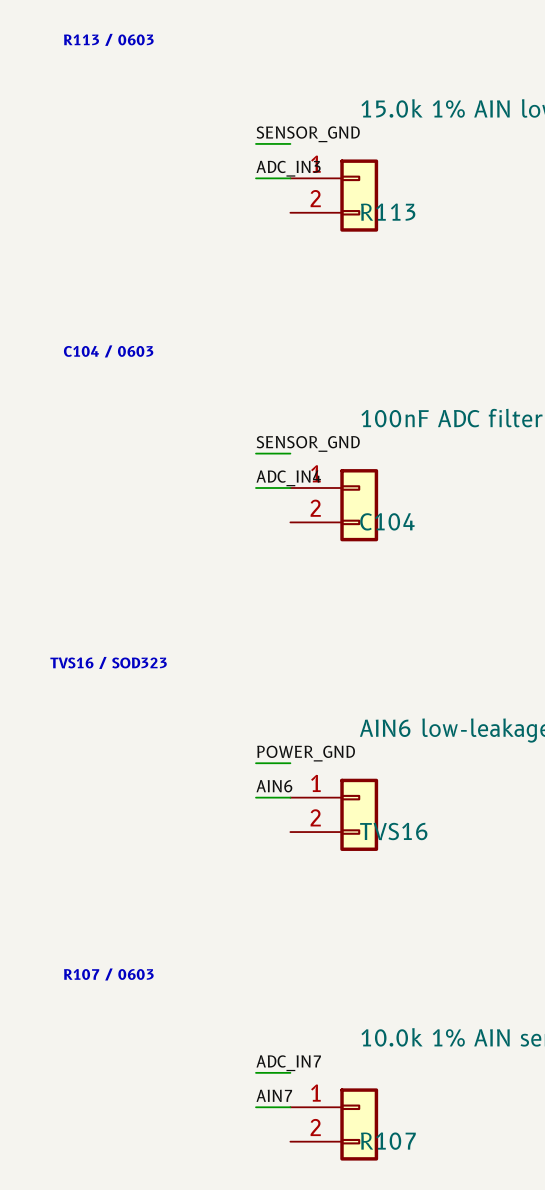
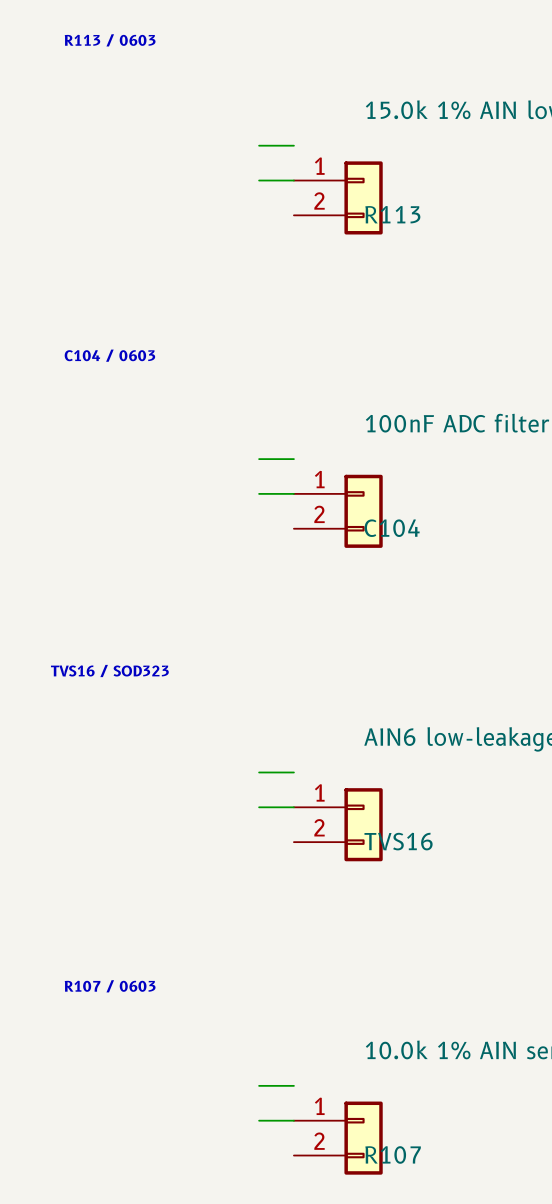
label: SENSOR_GND (308, 134) -> none
label: ADC_IN3 (288, 168) -> none
label: SENSOR_GND (308, 443) -> none
label: ADC_IN4 (288, 478) -> none
label: POWER_GND (306, 753) -> none
label: AIN6 (274, 786) -> none
label: ADC_IN7 (288, 1063) -> none
label: AIN7 (274, 1095) -> none

